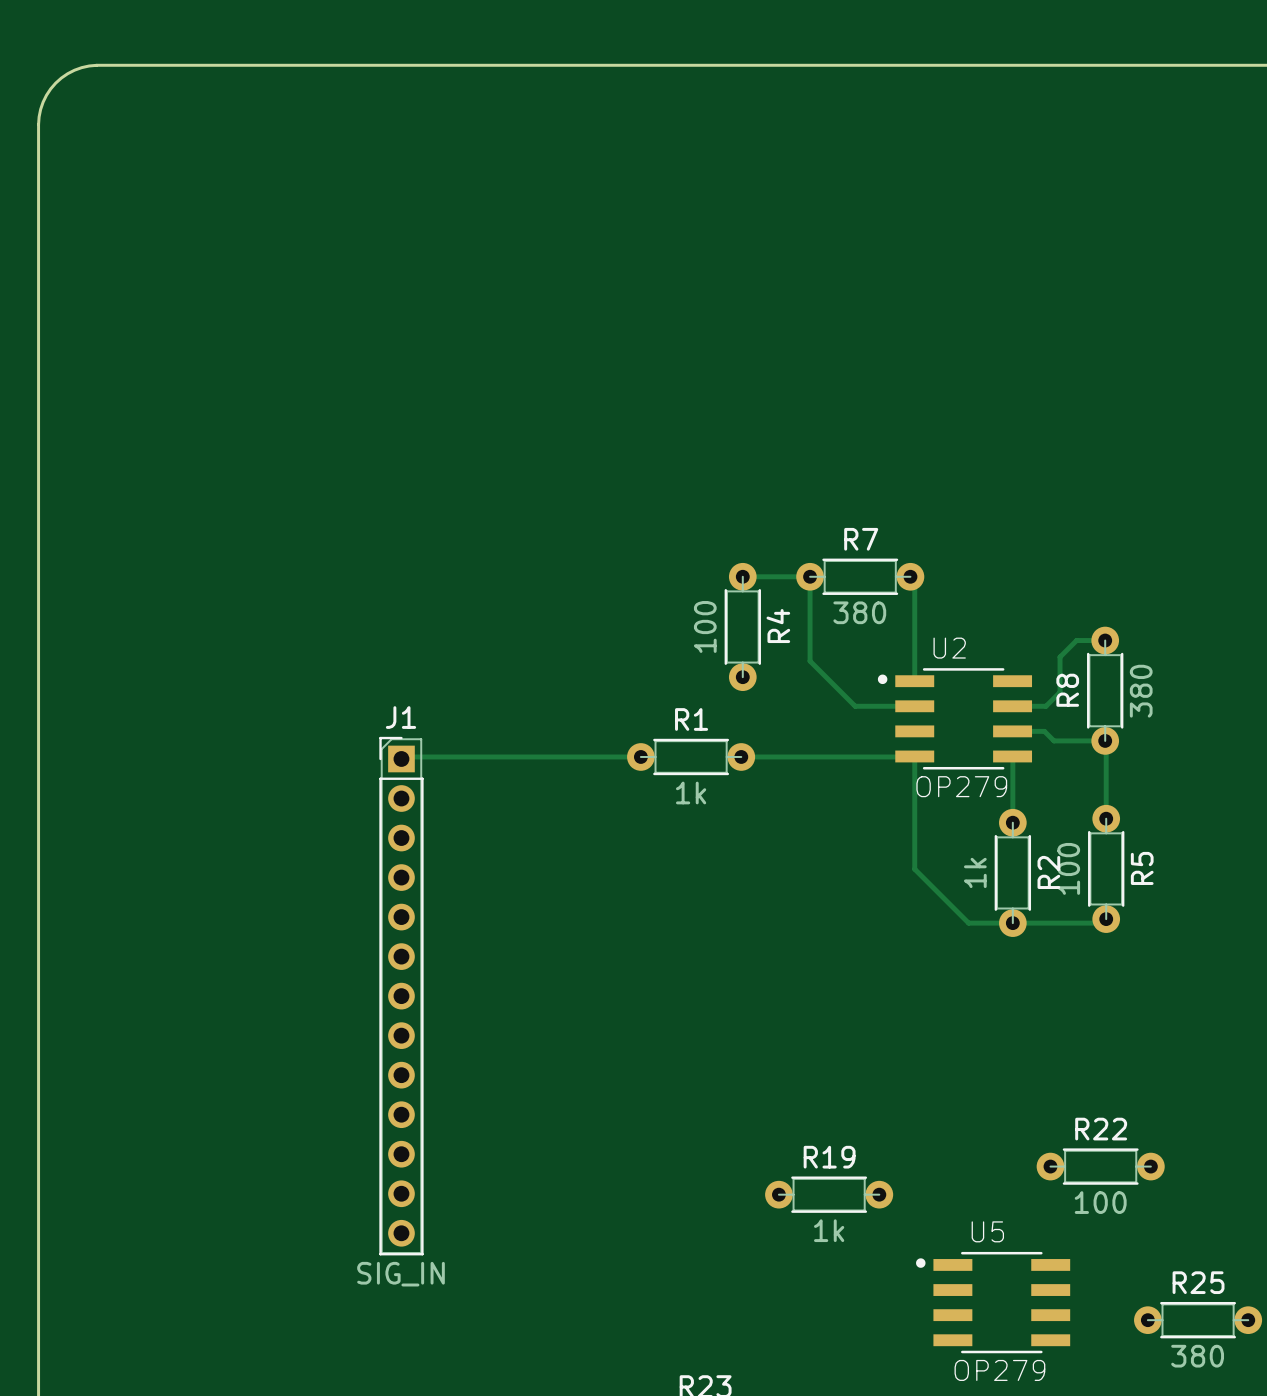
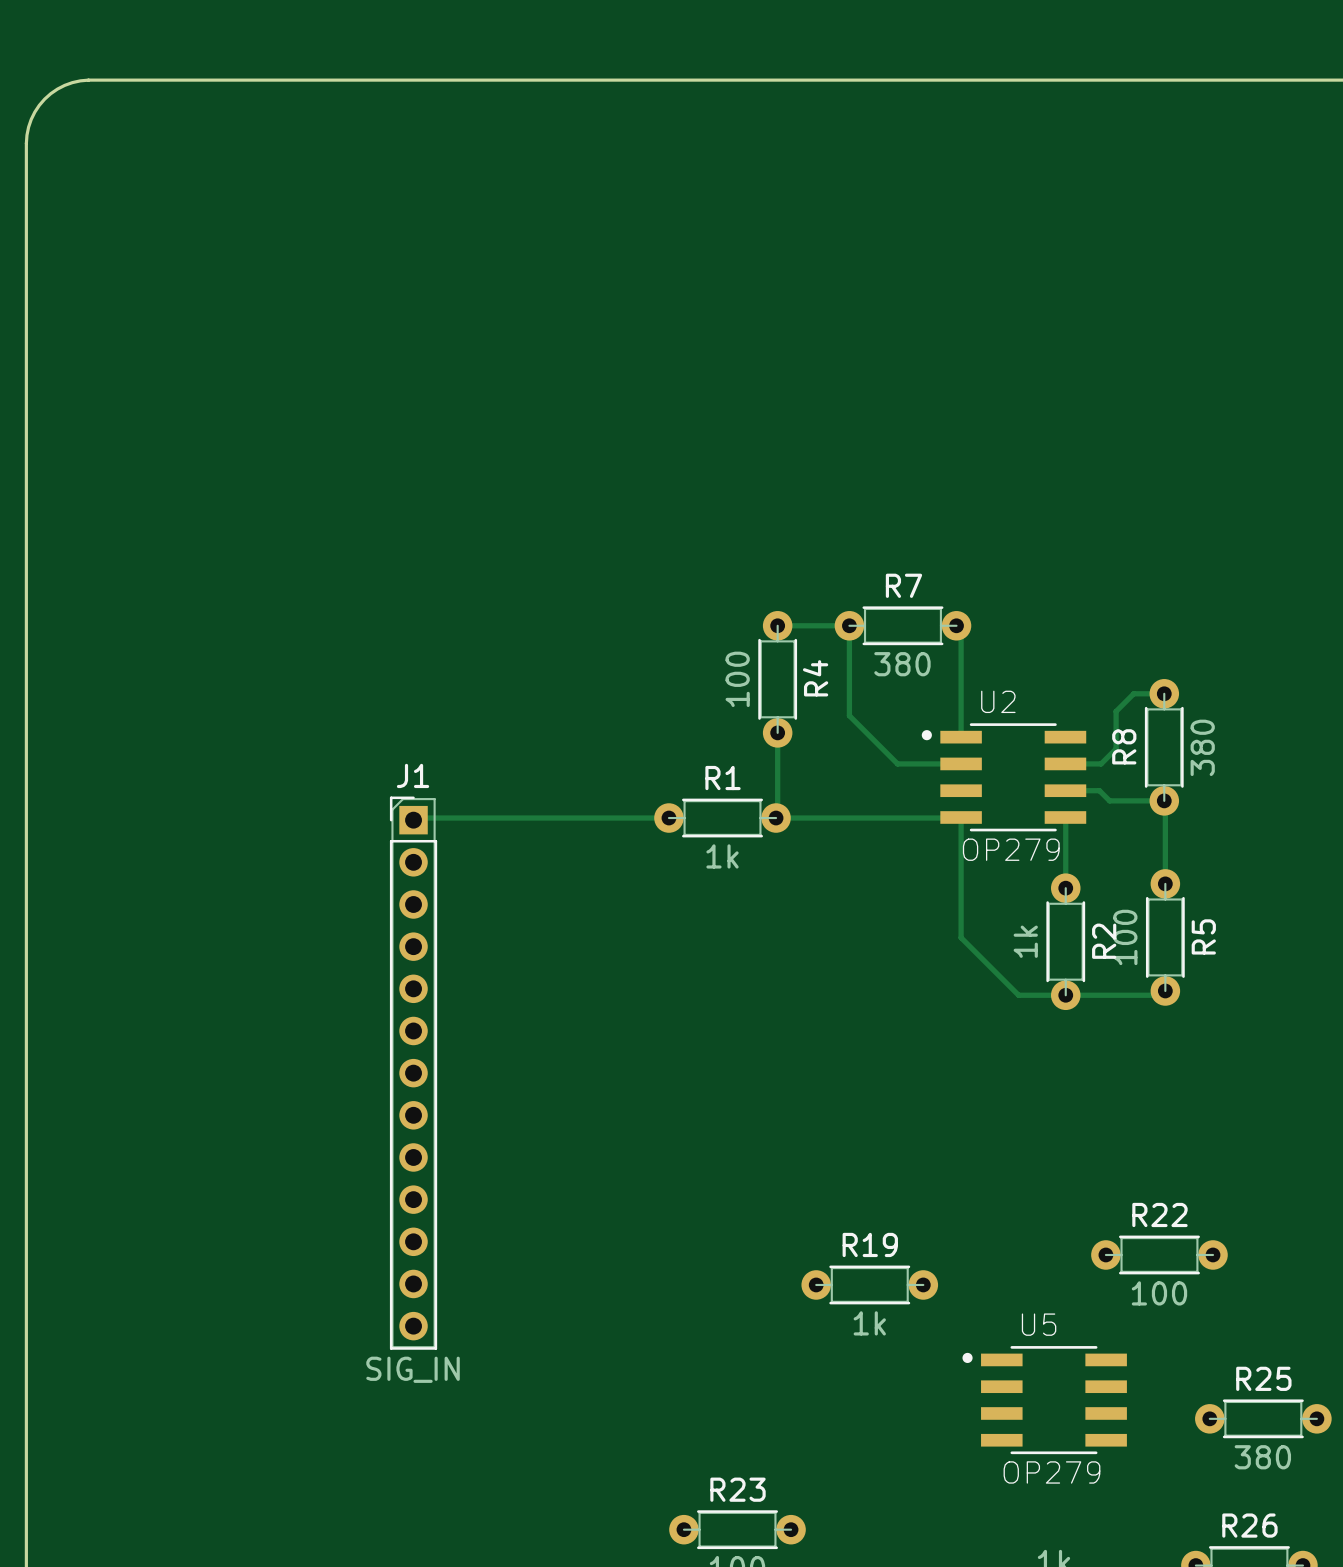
track: none -> (777, 732) (777, 816)

